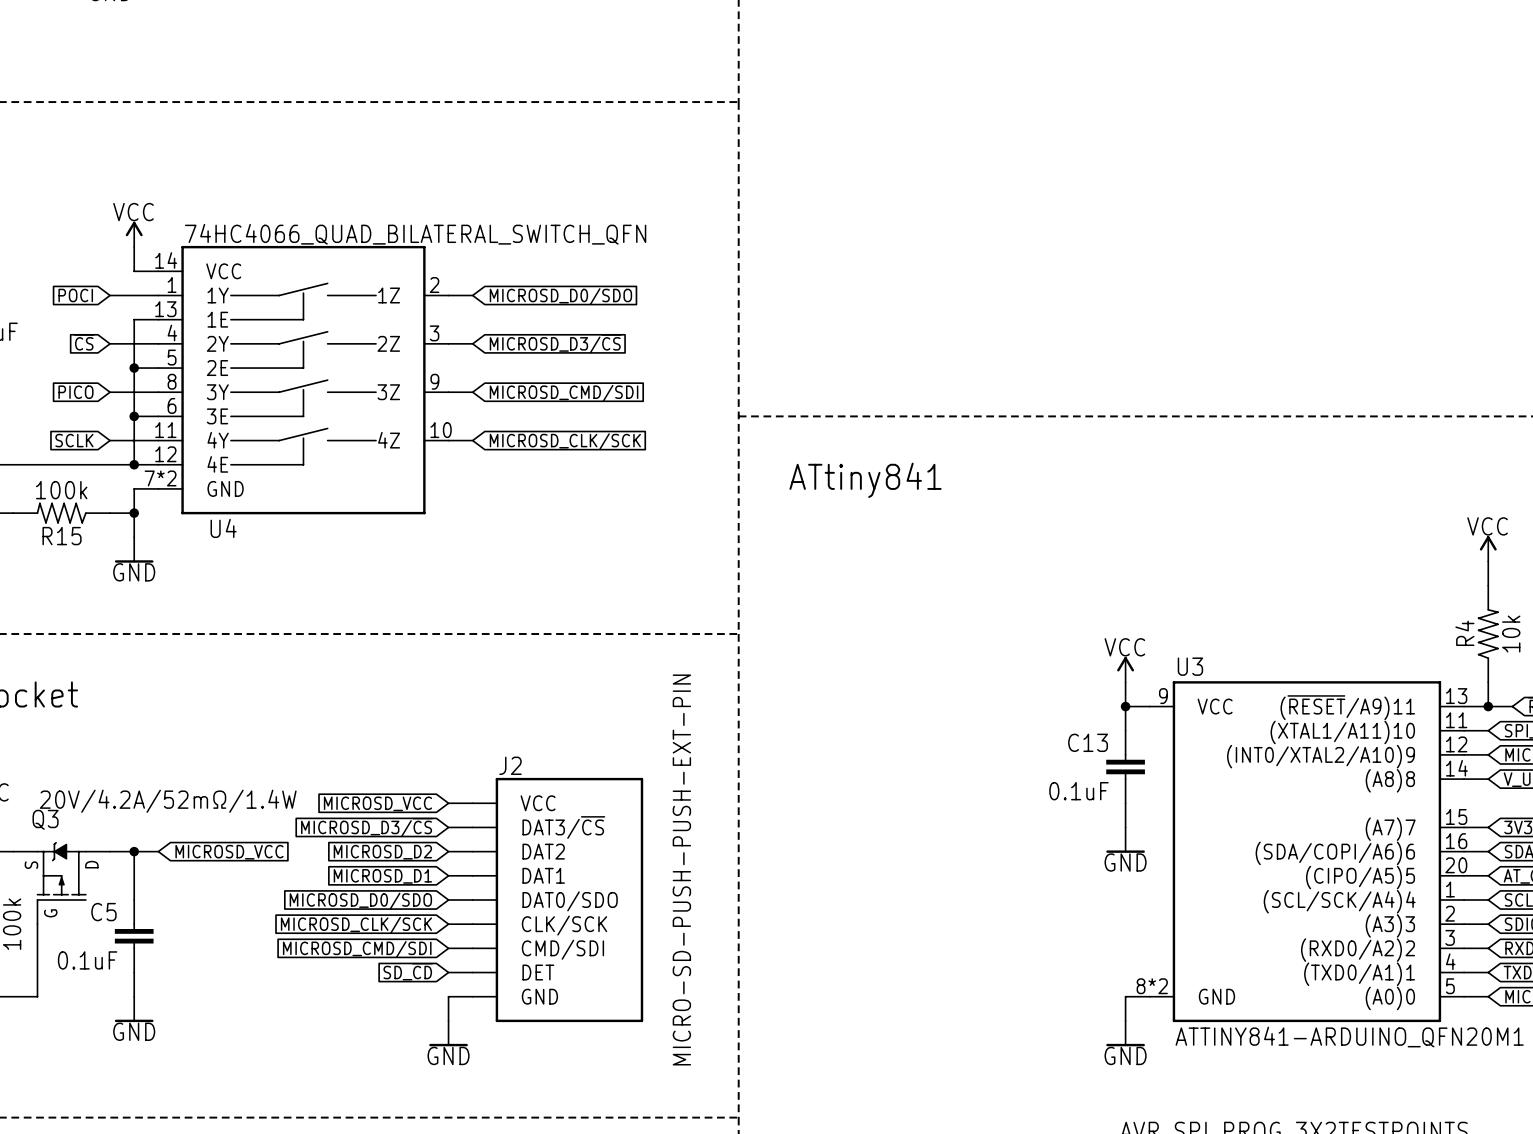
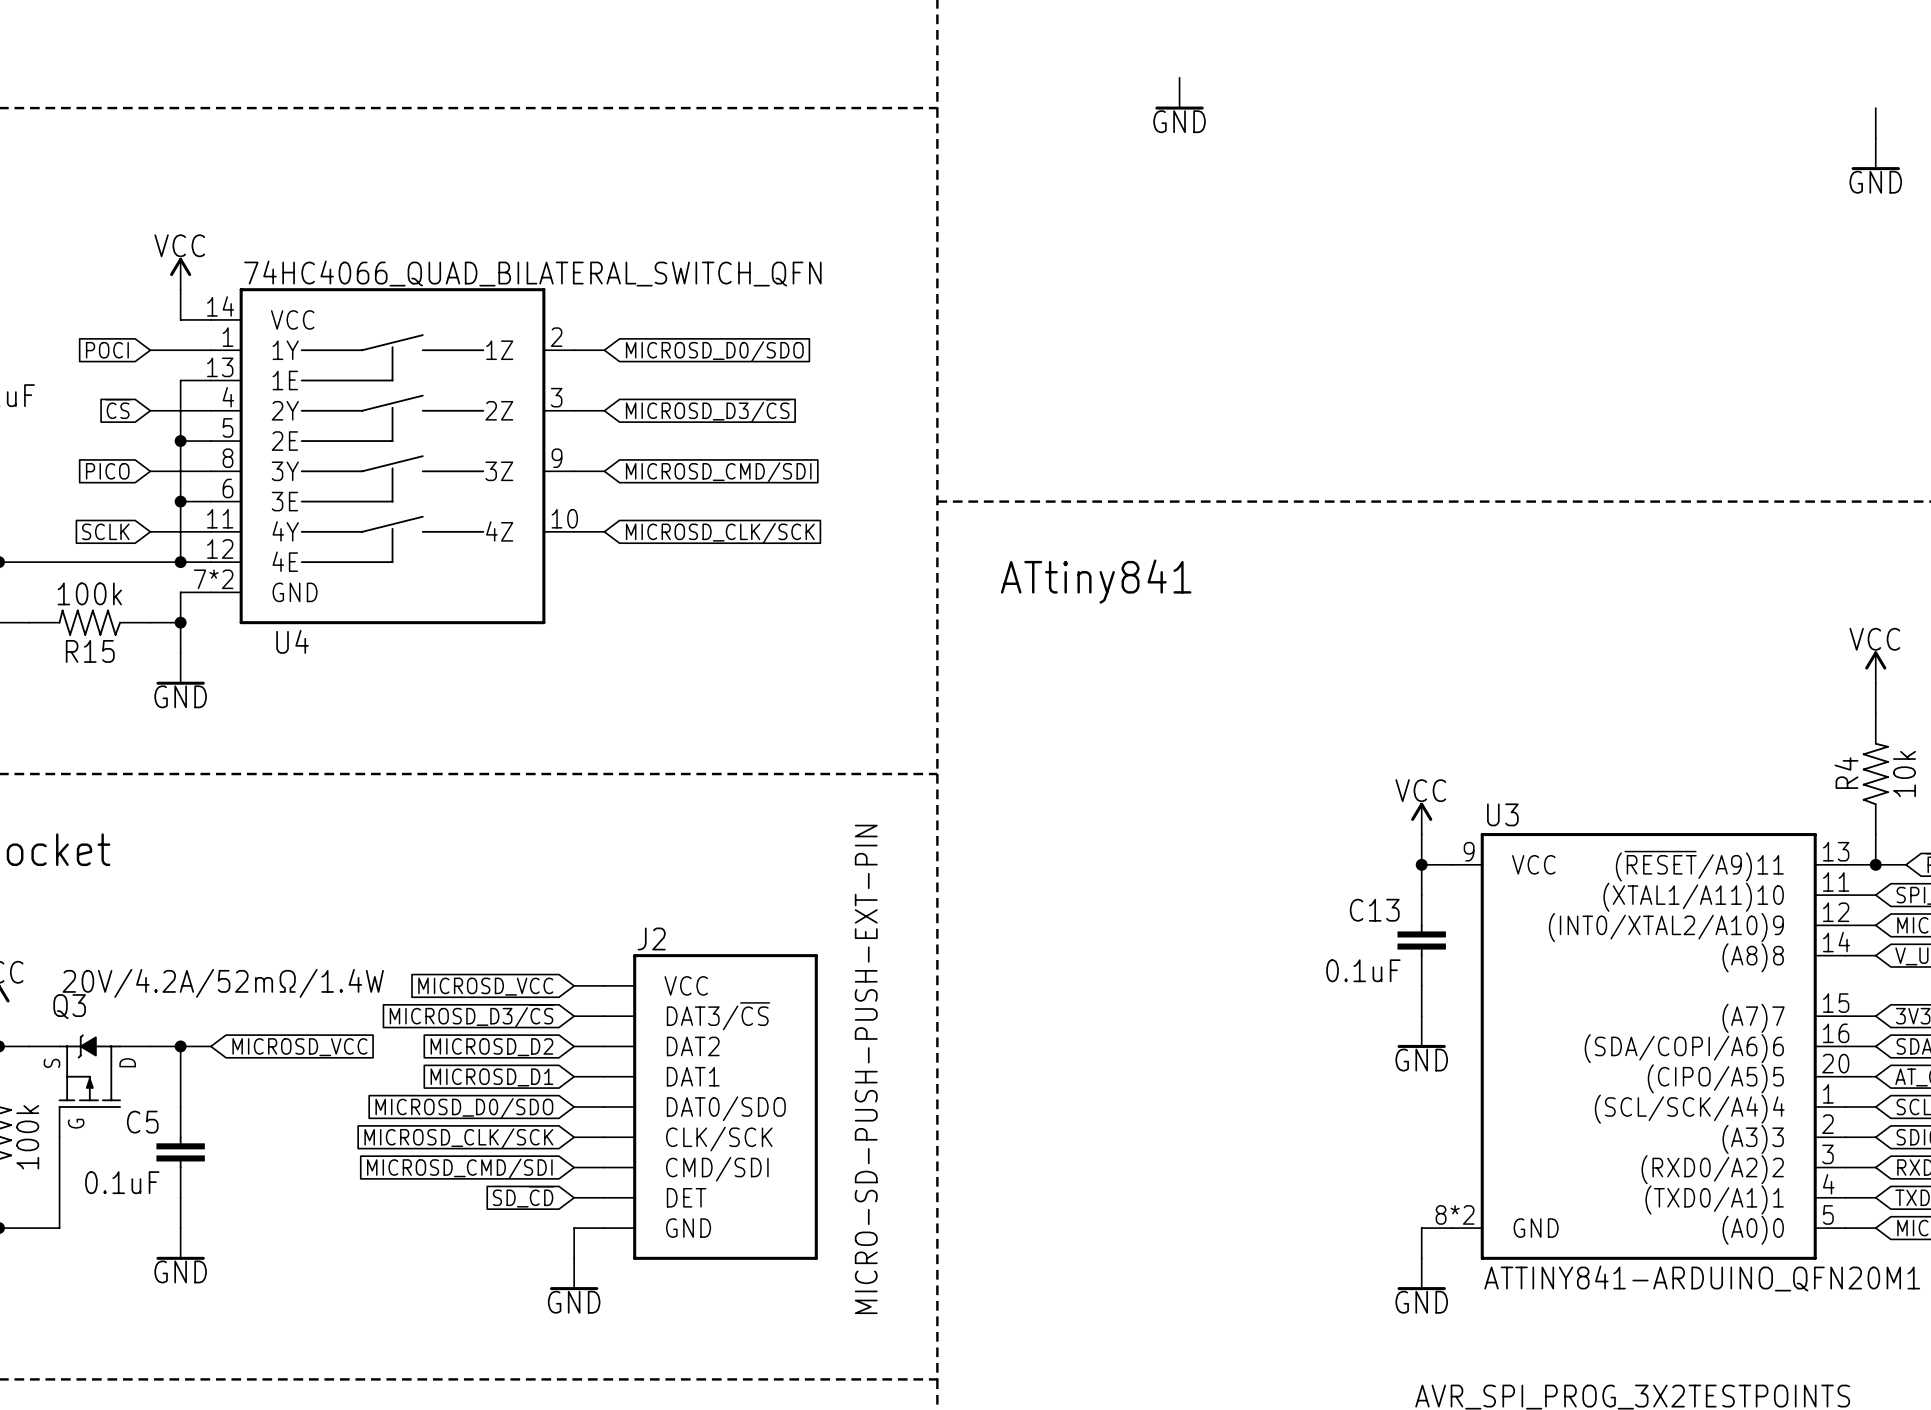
power symbol: none -> GND (1179, 93)
wire: none -> (1875, 108) (1875, 138)
power symbol: none -> GND (1875, 154)

